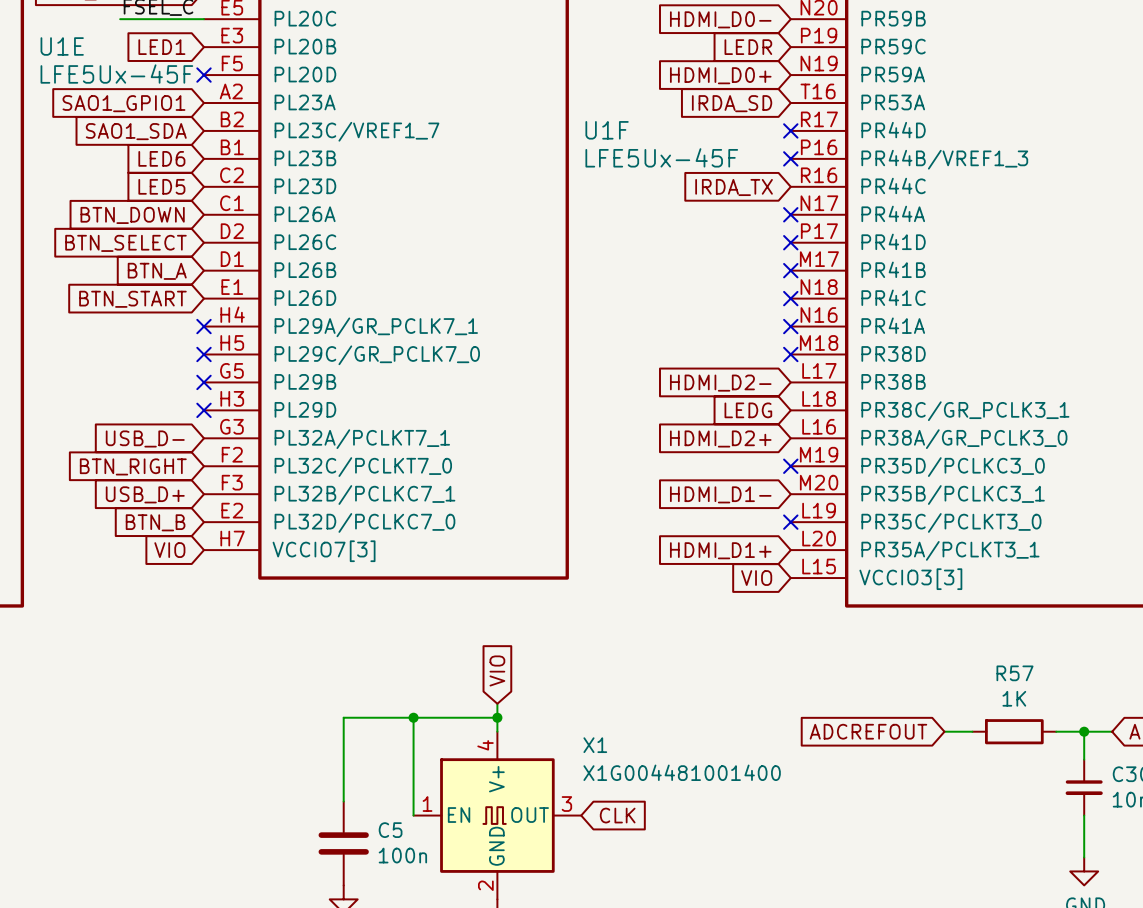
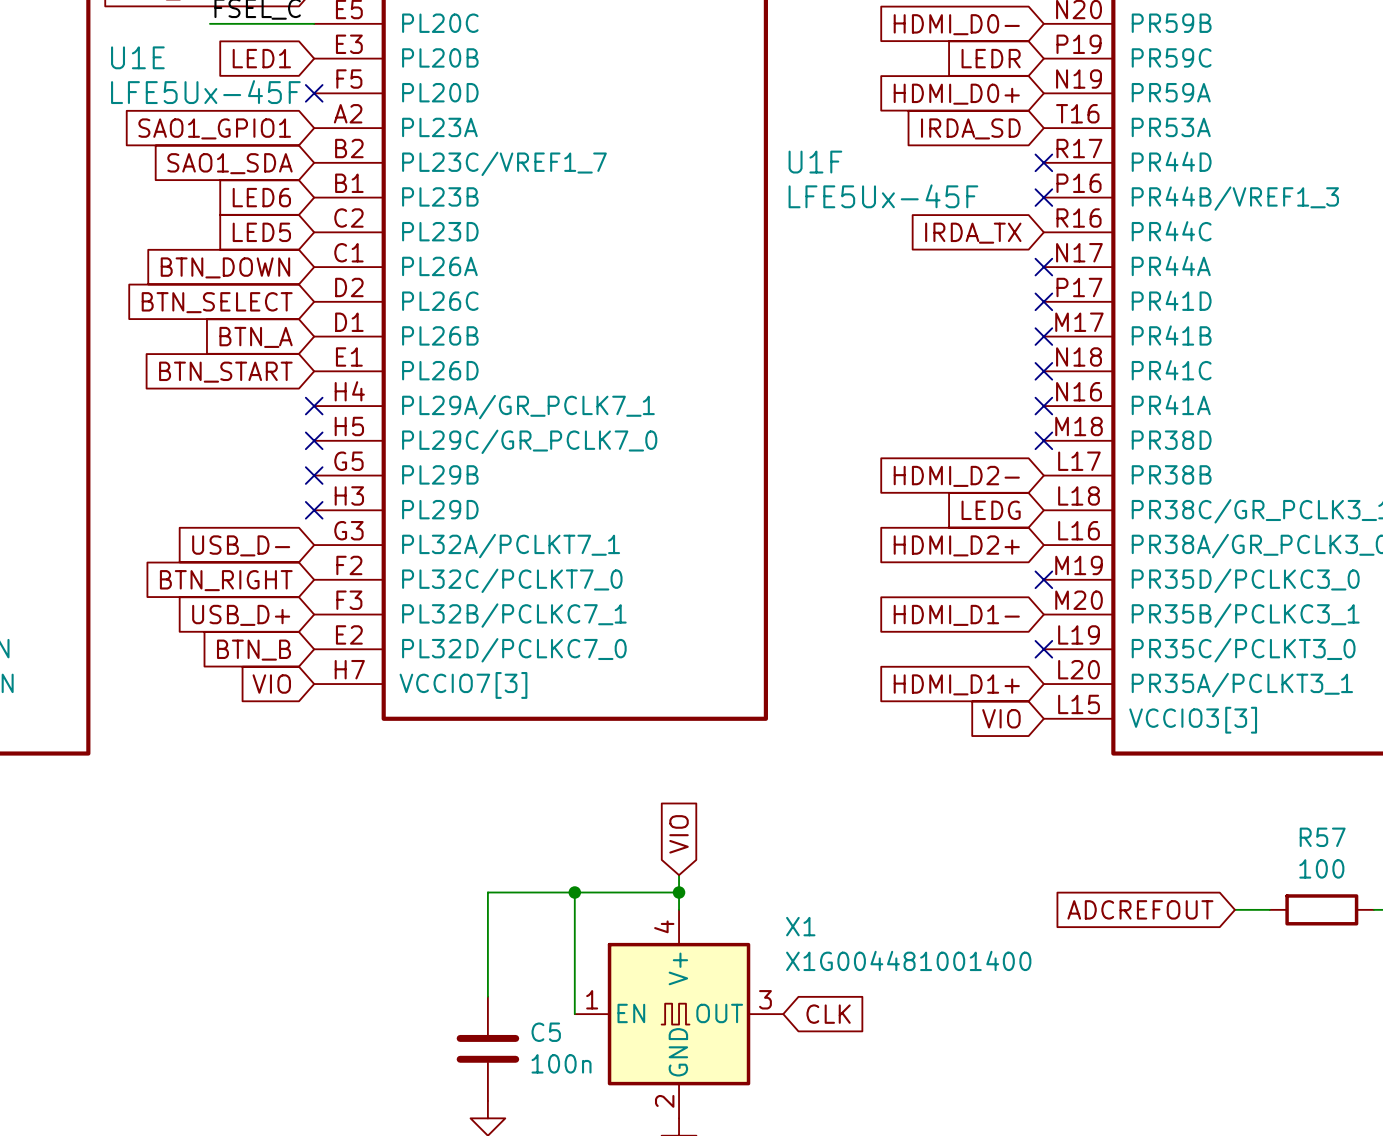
R57 value: 1K (1014, 698) -> 100 (1321, 868)

